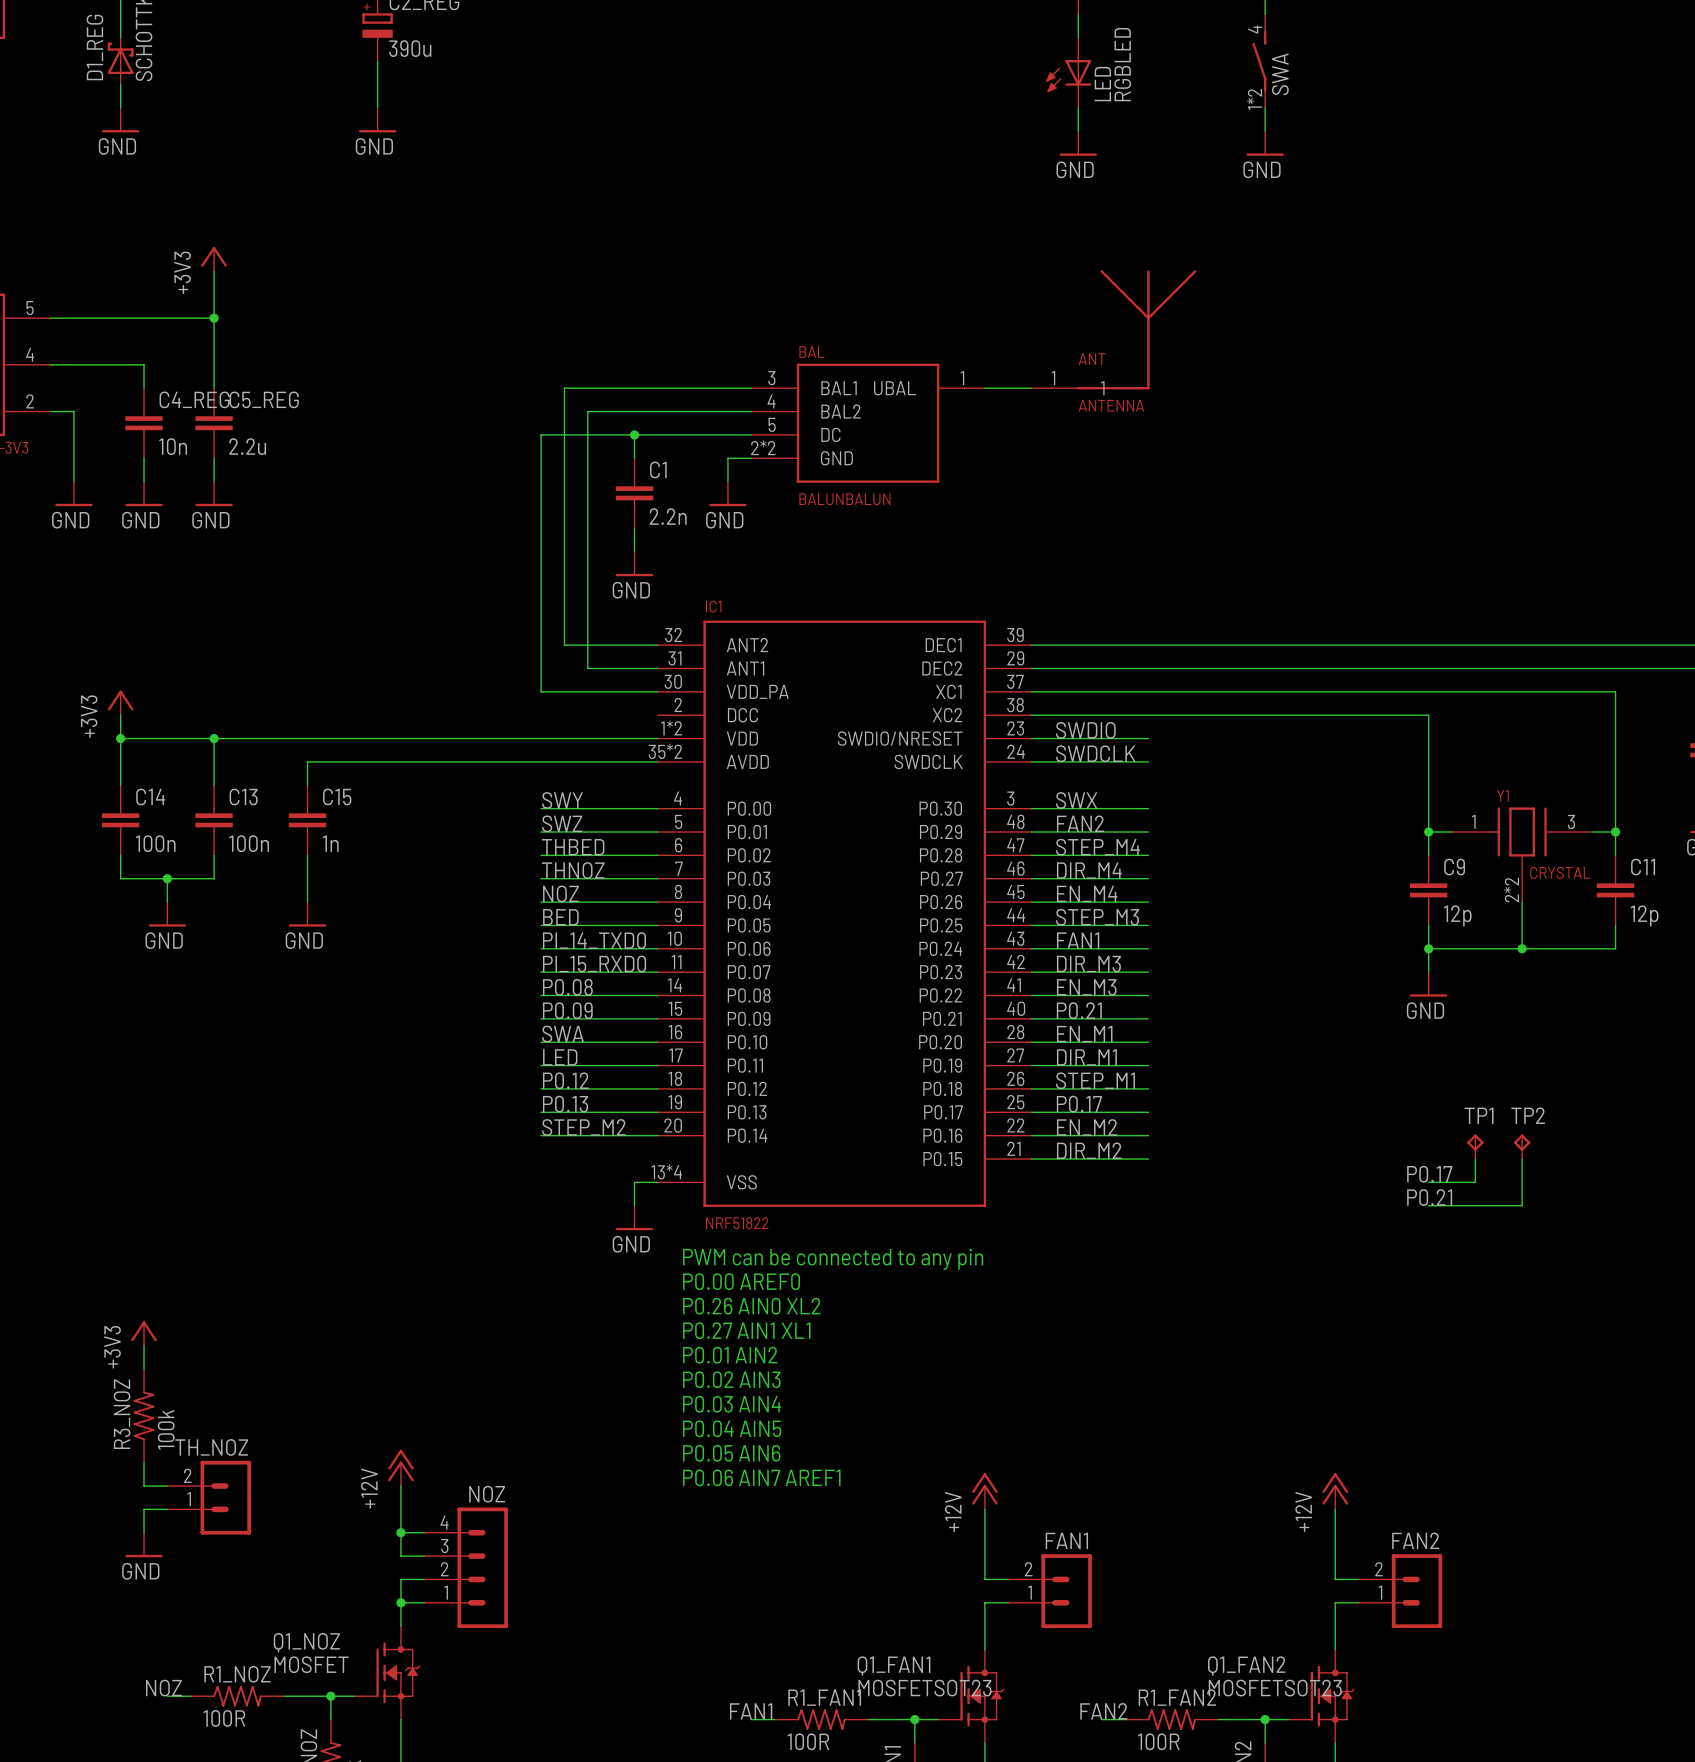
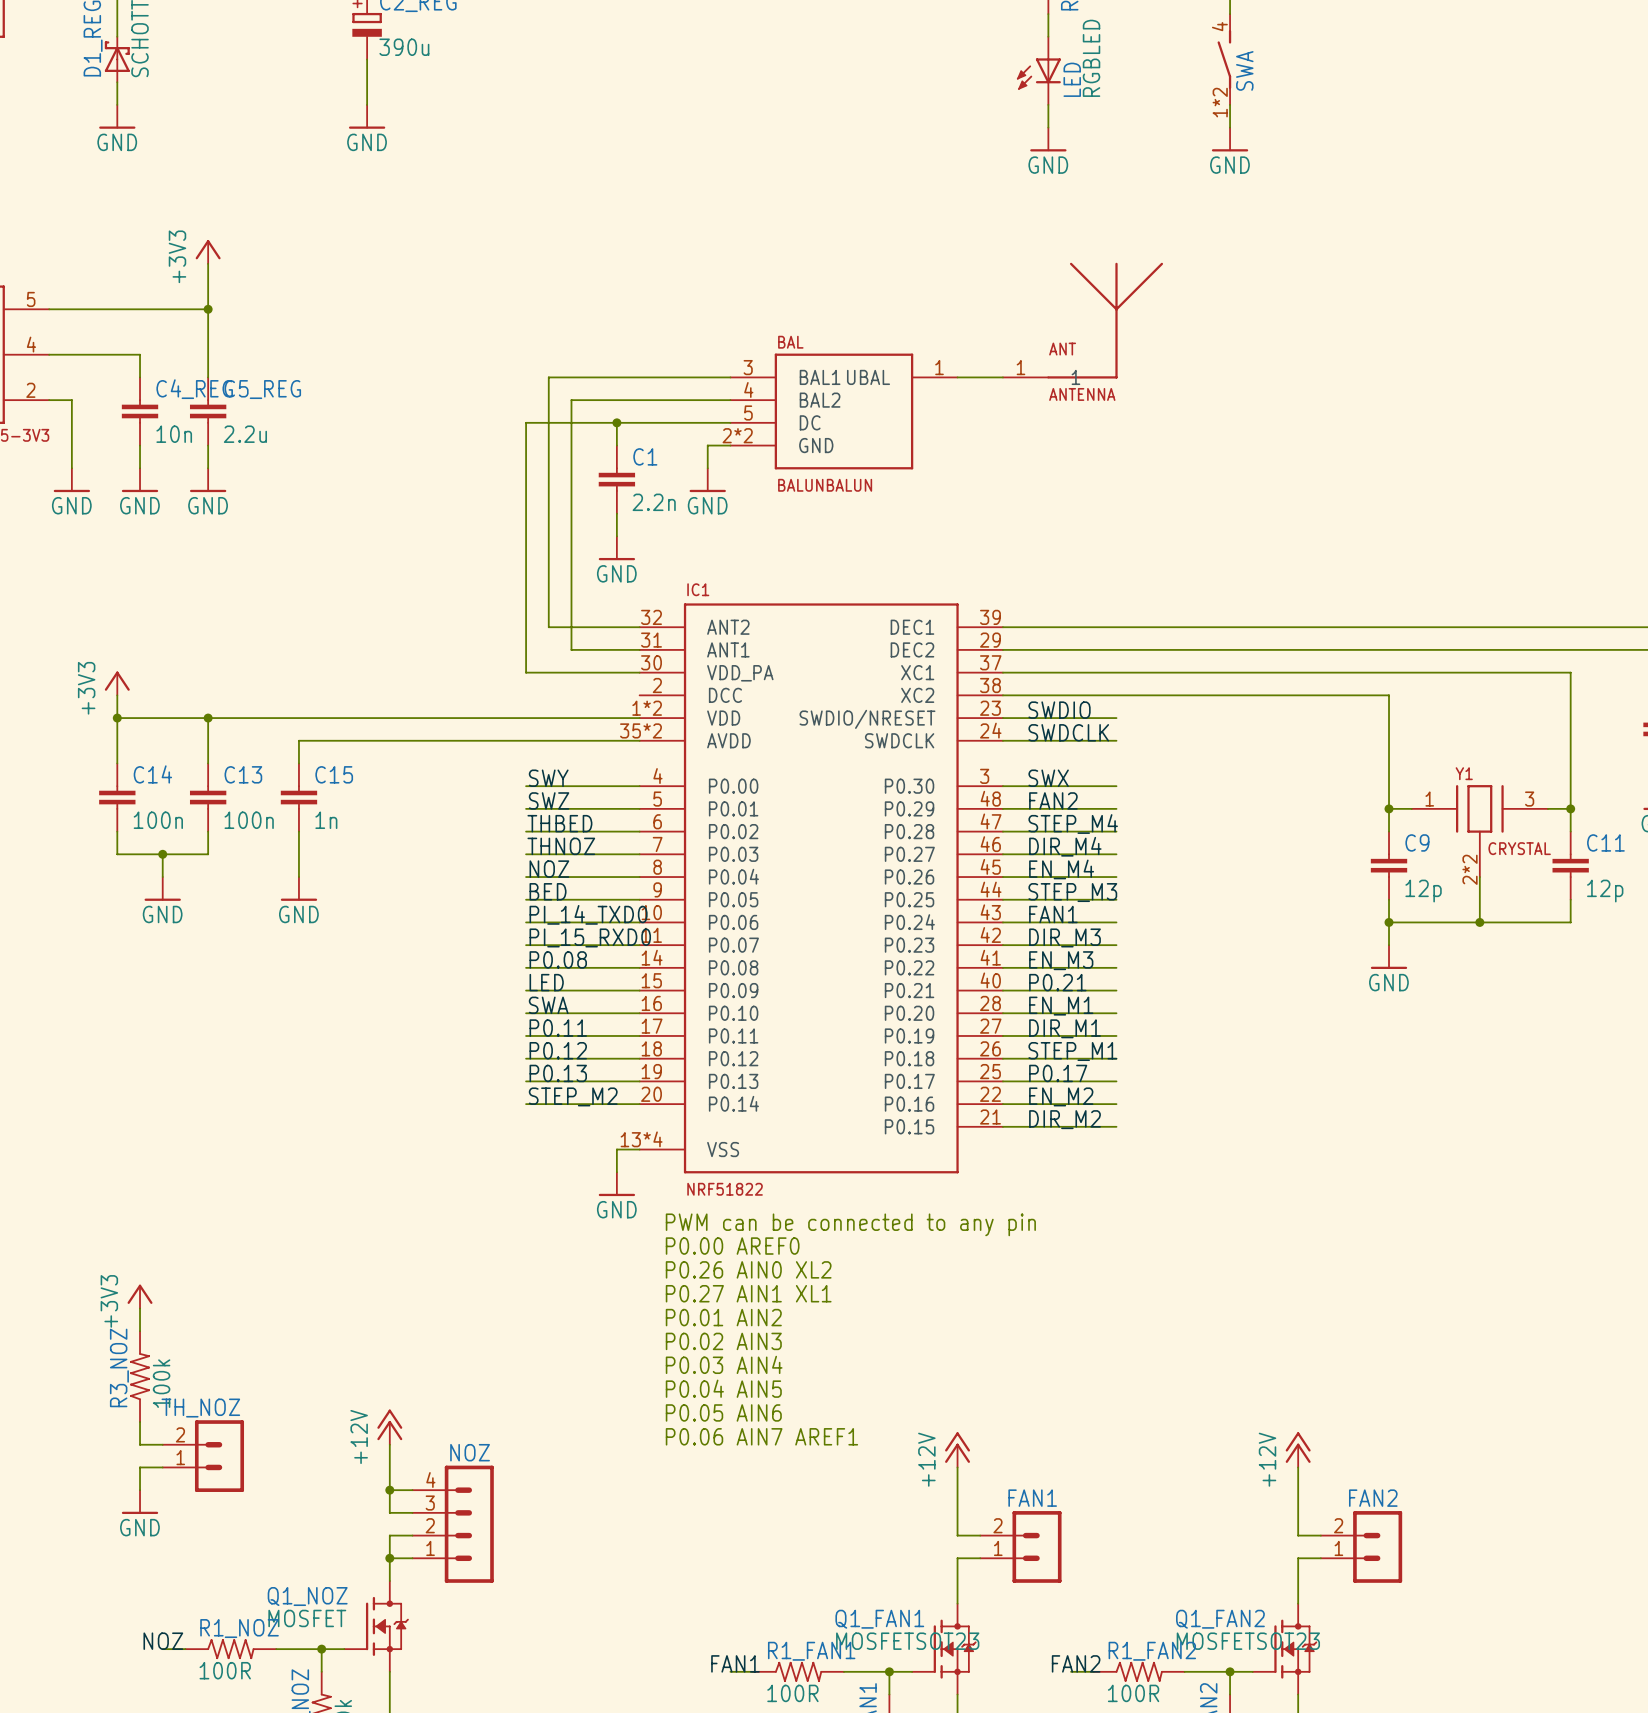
label: P0.09 (567, 1010) -> LED (546, 982)
label: LED (560, 1057) -> P0.11 (558, 1028)
TP1: (1475, 1146) -> none
TP2: (1522, 1146) -> none
wire: (1475, 1159) (1475, 1182) (1428, 1182) -> none
wire: (1522, 1159) (1522, 1205) (1428, 1205) -> none
label: P0.17 (1429, 1174) -> none
label: P0.21 (1429, 1197) -> none

